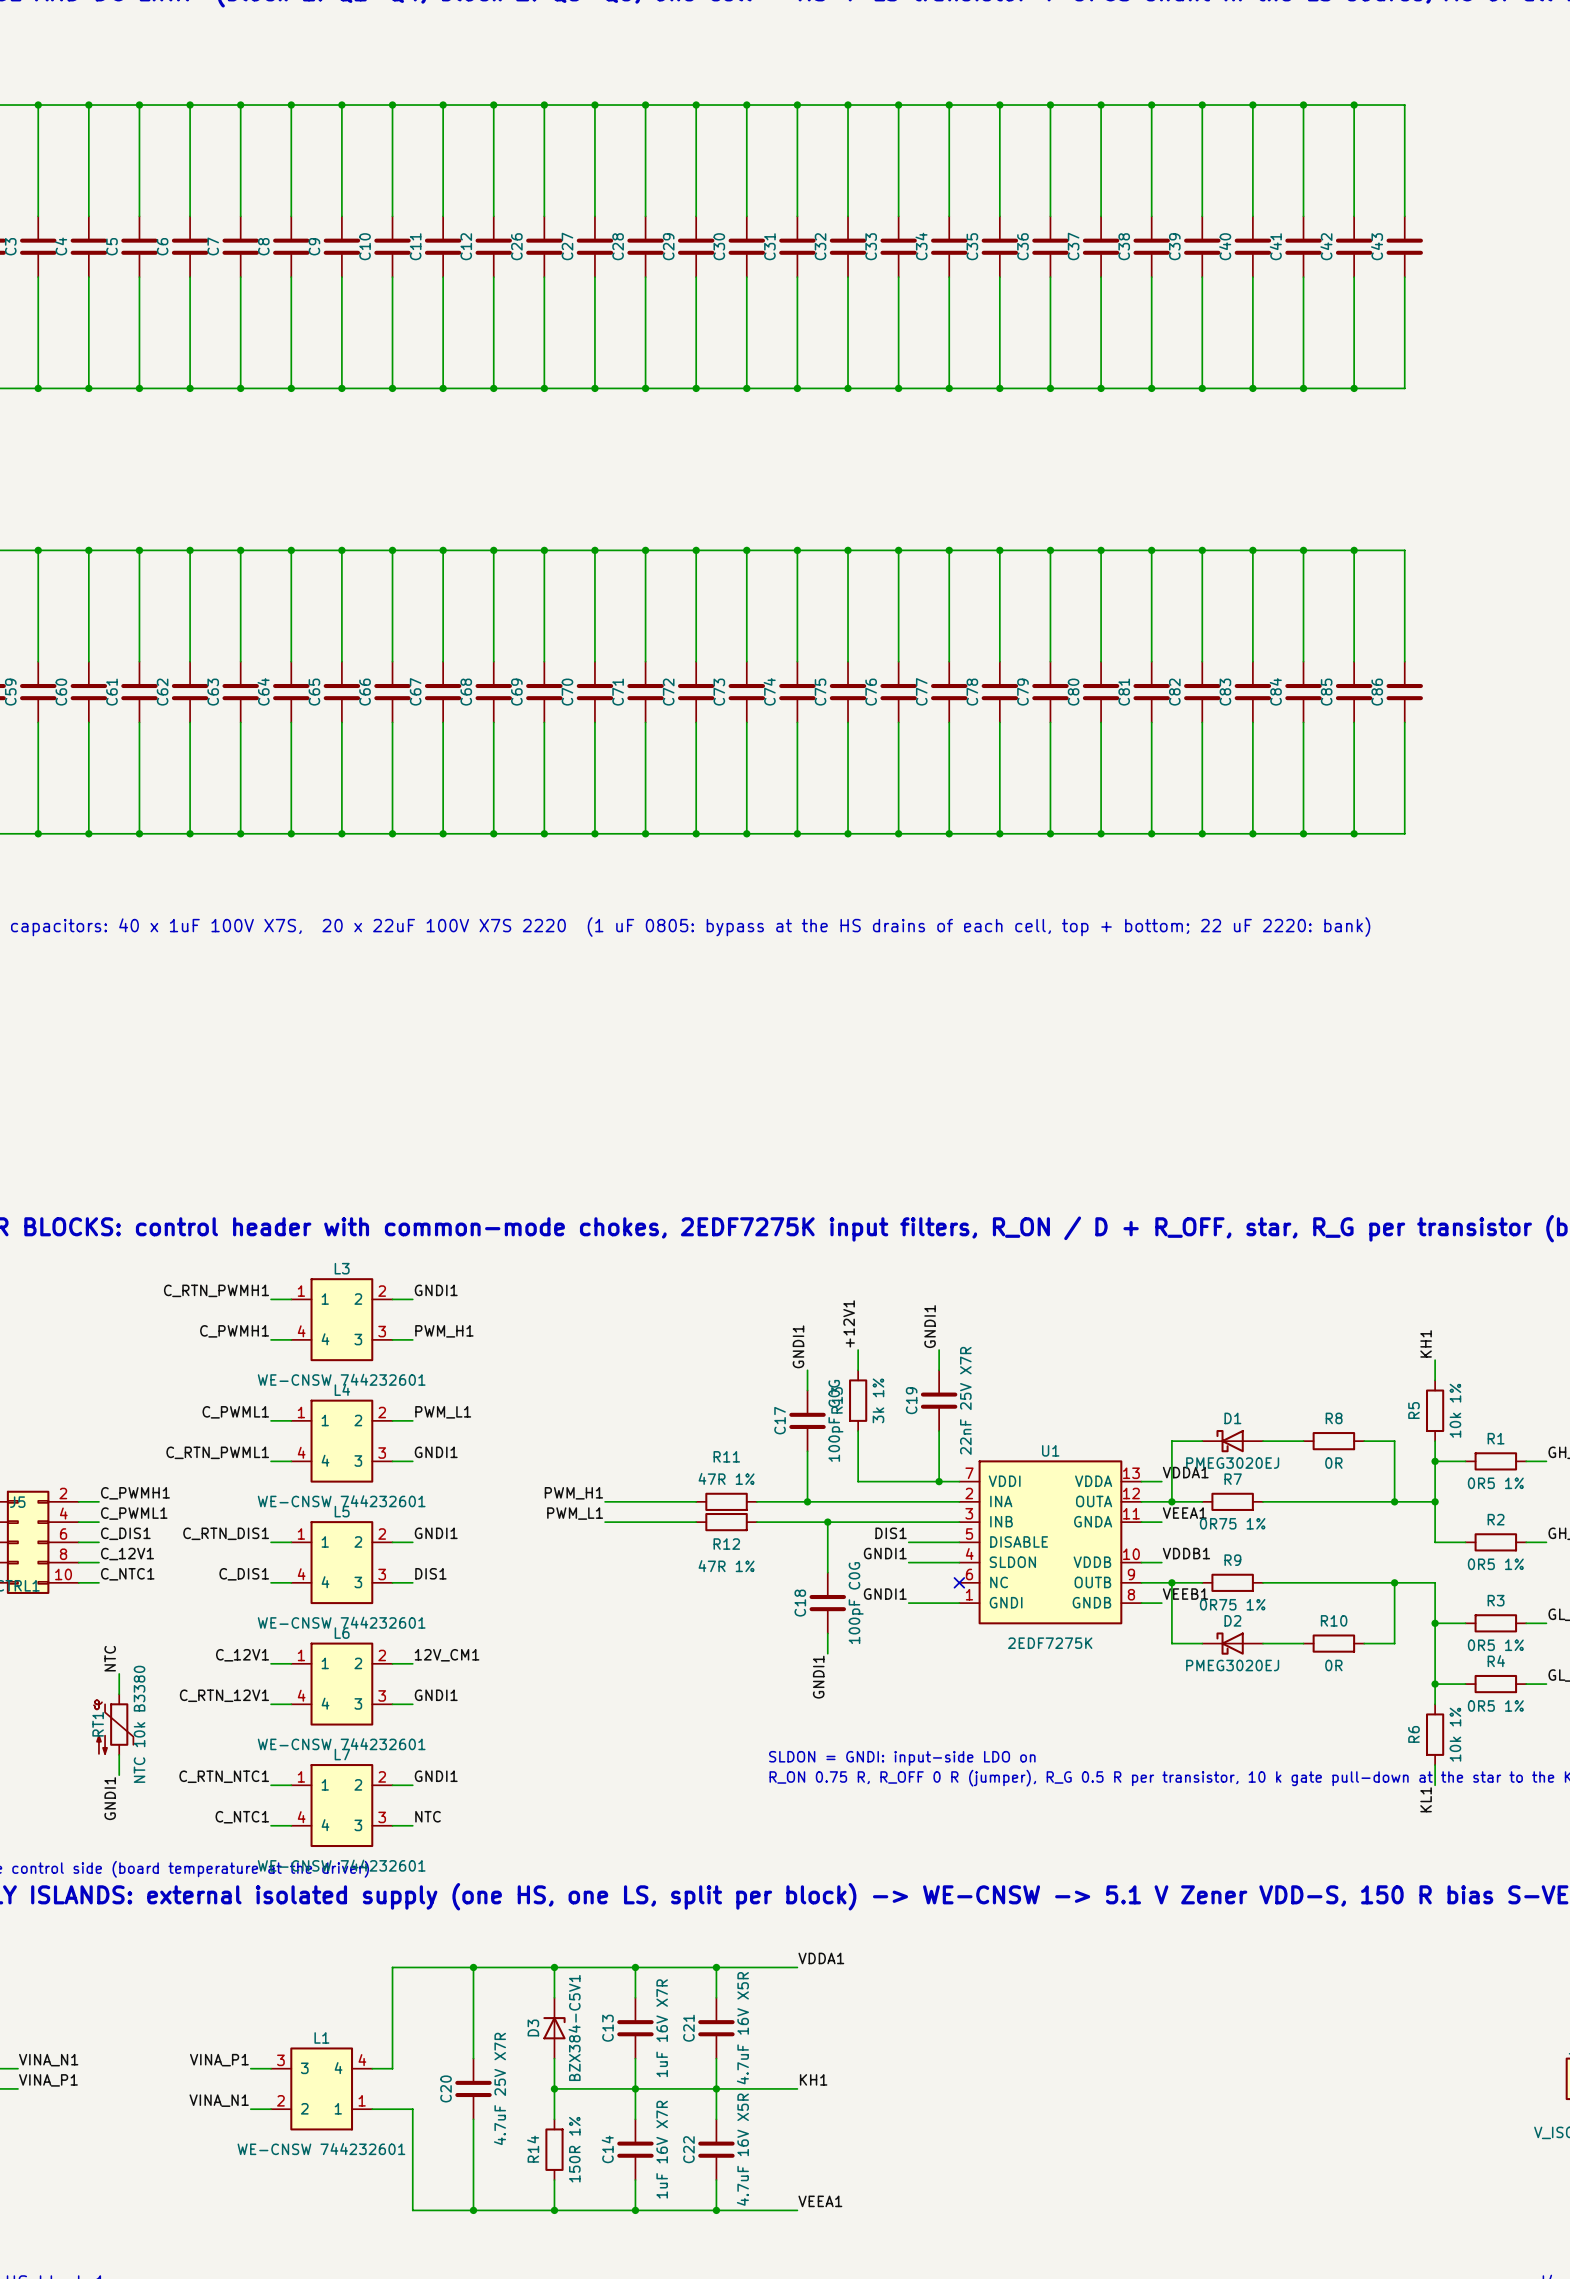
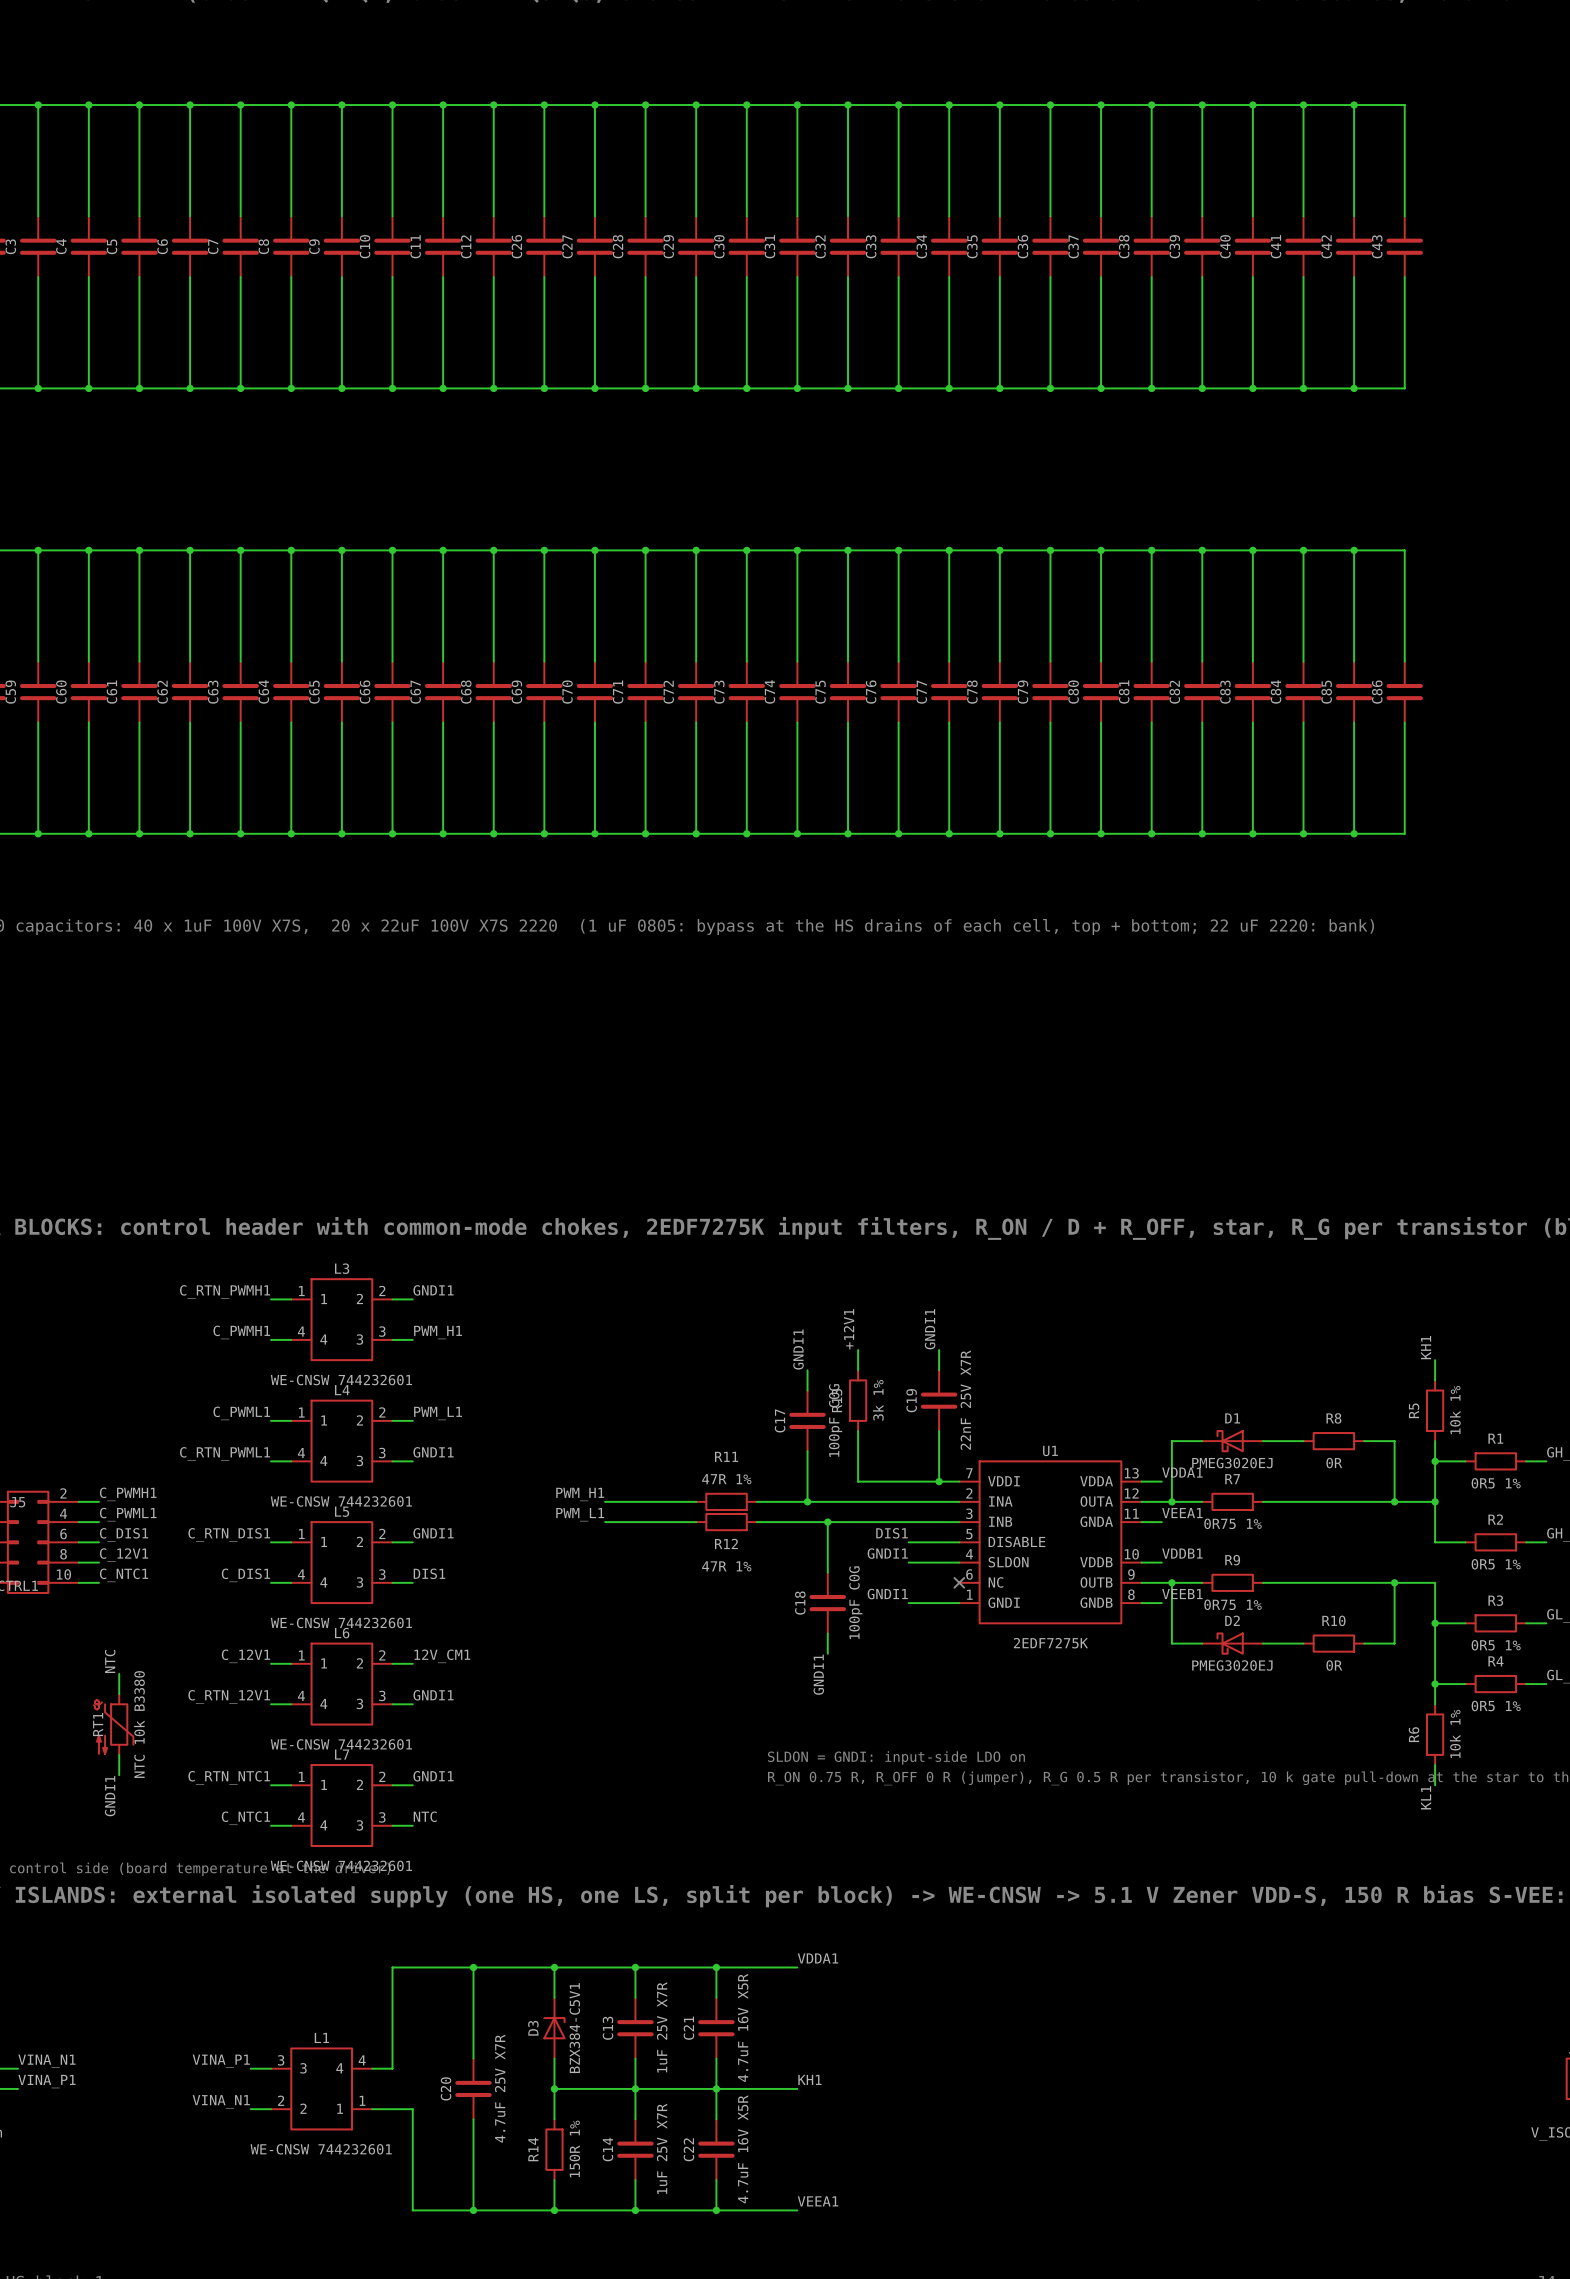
C13 value: 1uF 16V X7R (662, 2028) -> 1uF 25V X7R (662, 2027)
C14 value: 1uF 16V X7R (662, 2149) -> 1uF 25V X7R (662, 2148)

